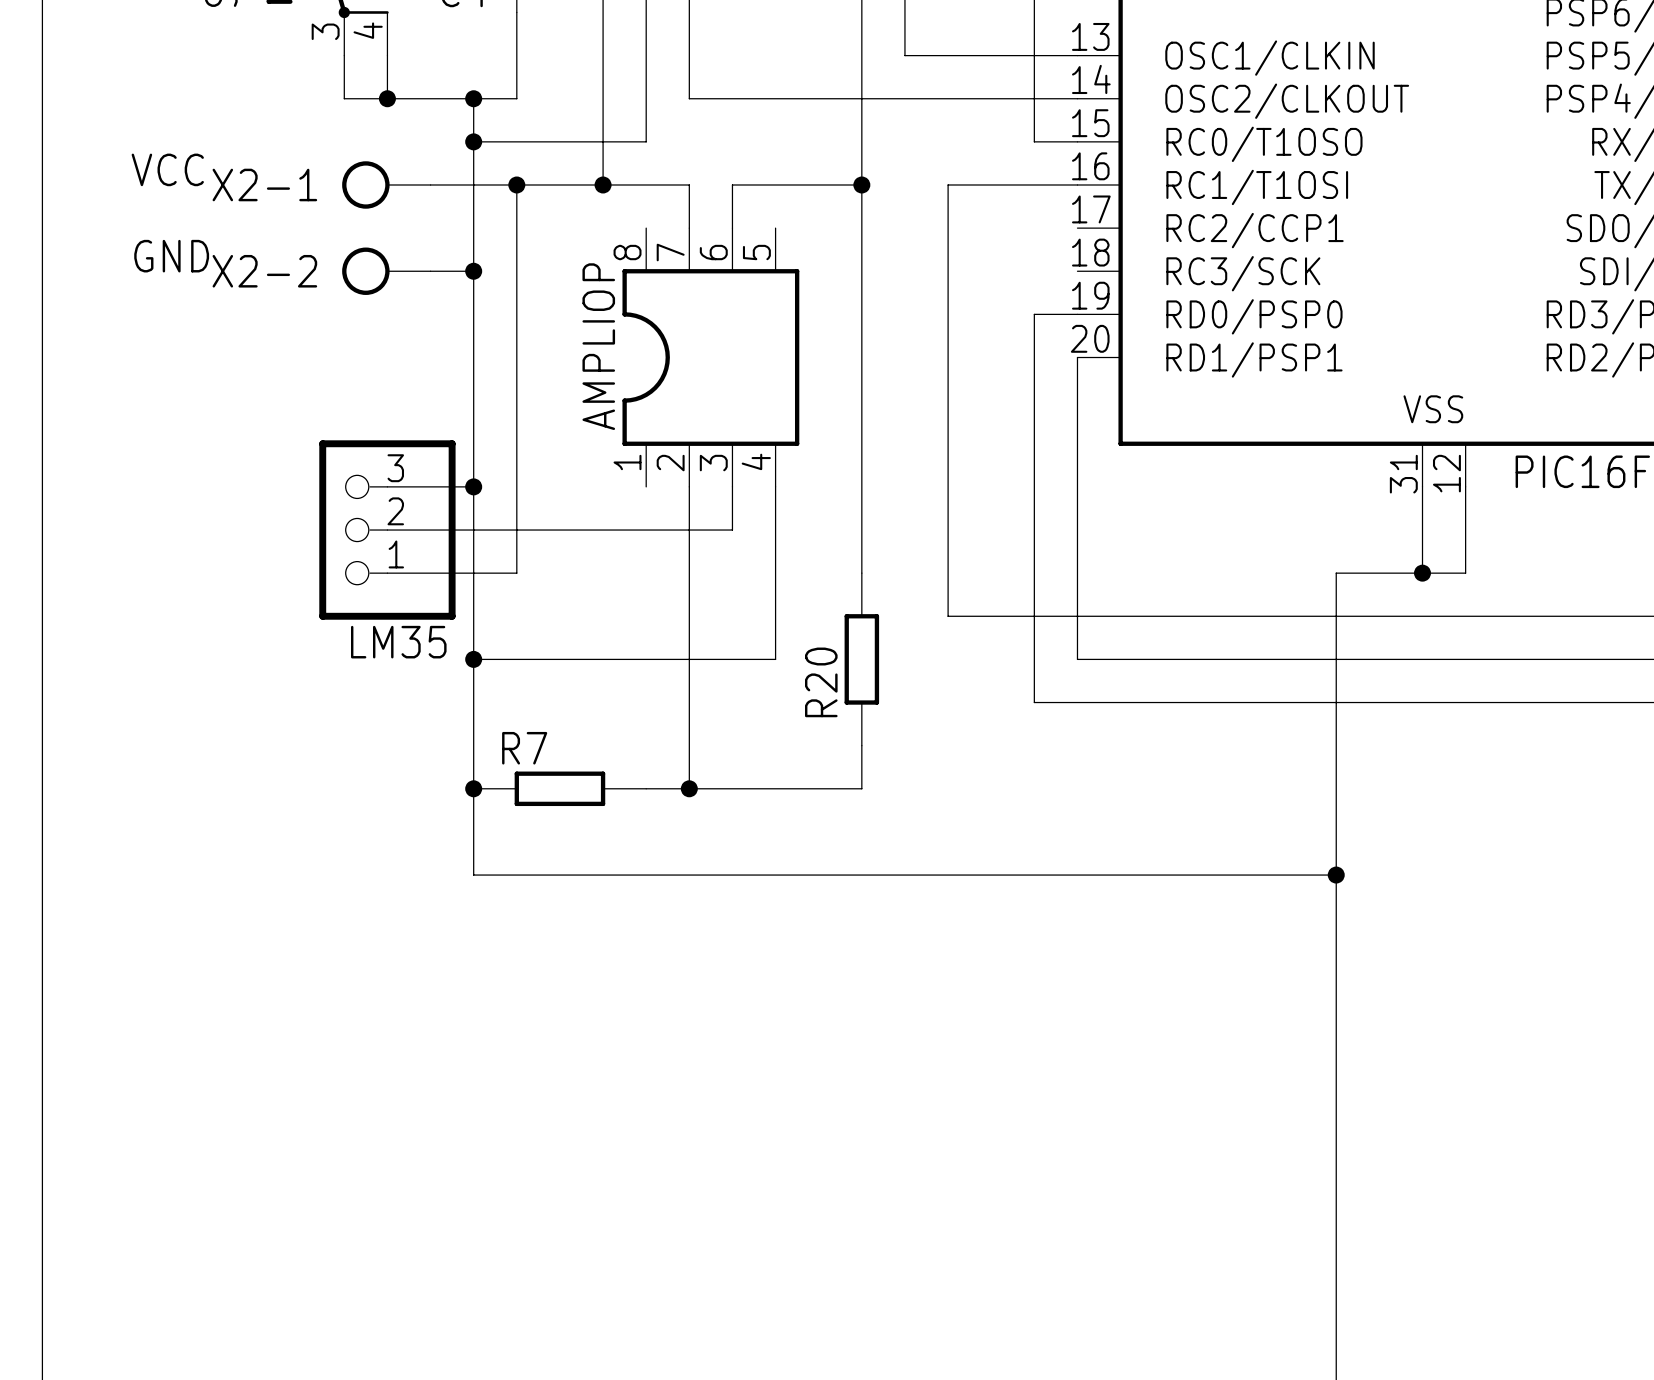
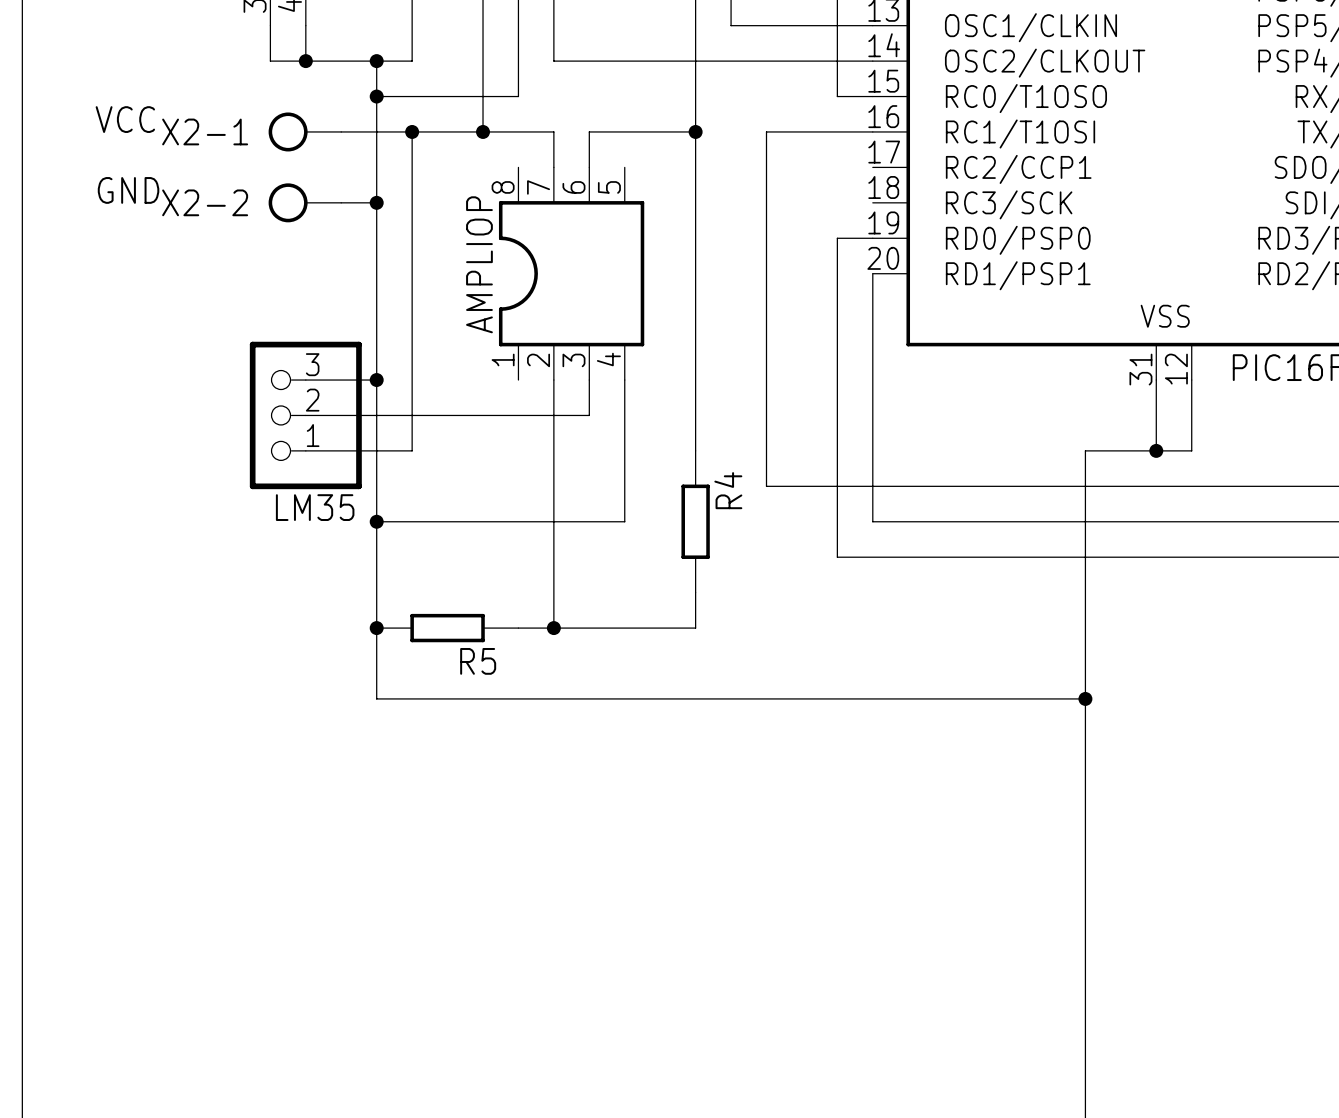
R20 name: R20 (821, 682) -> R4 (728, 490)
R7 name: R7 (524, 748) -> R5 (478, 661)

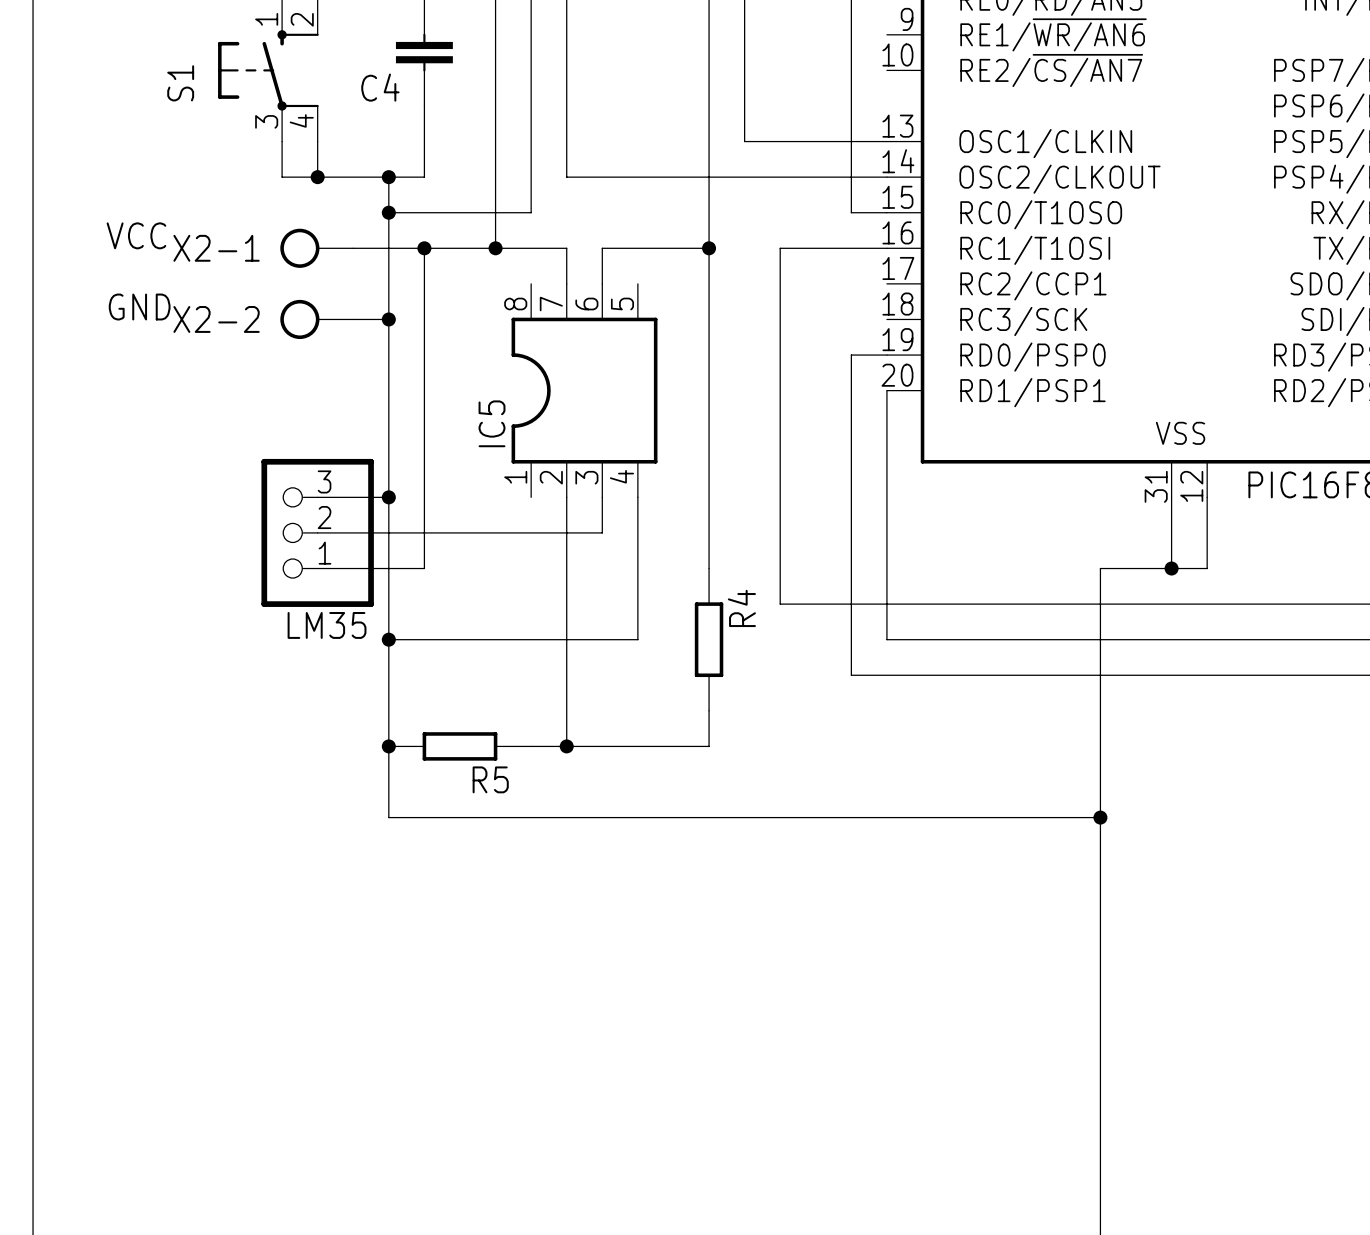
AMPLIOP name: AMPLIOP (479, 264) -> IC5 (492, 423)

